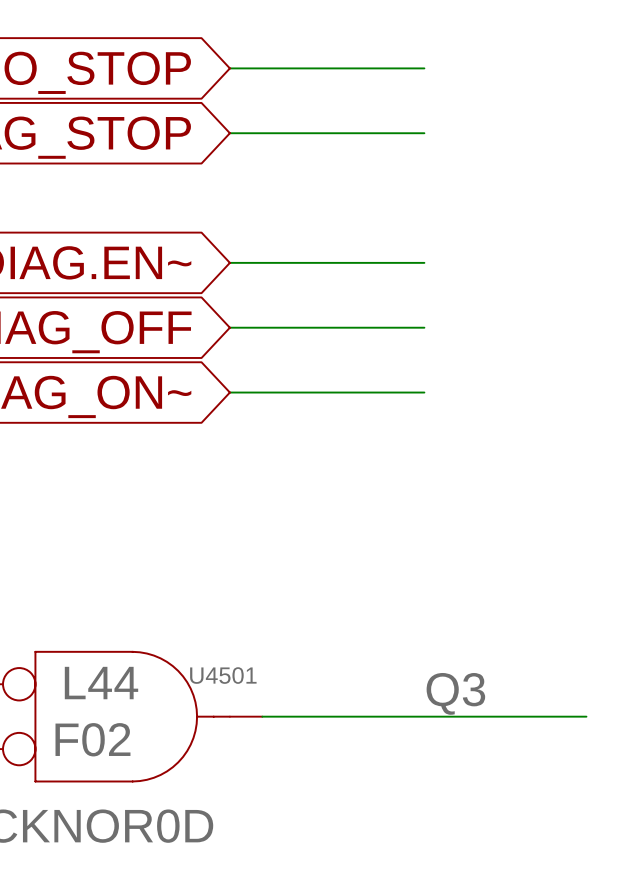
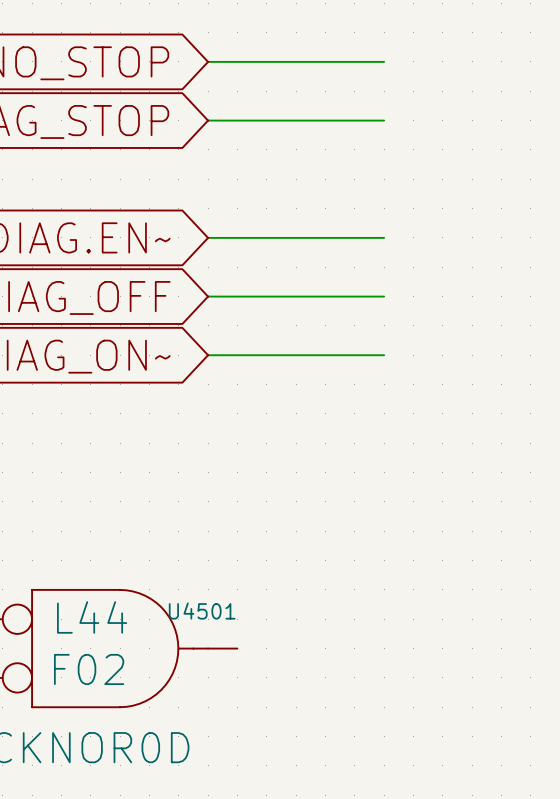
label: Q3 (455, 693) -> none
wire: (262, 716) (586, 716) -> none

